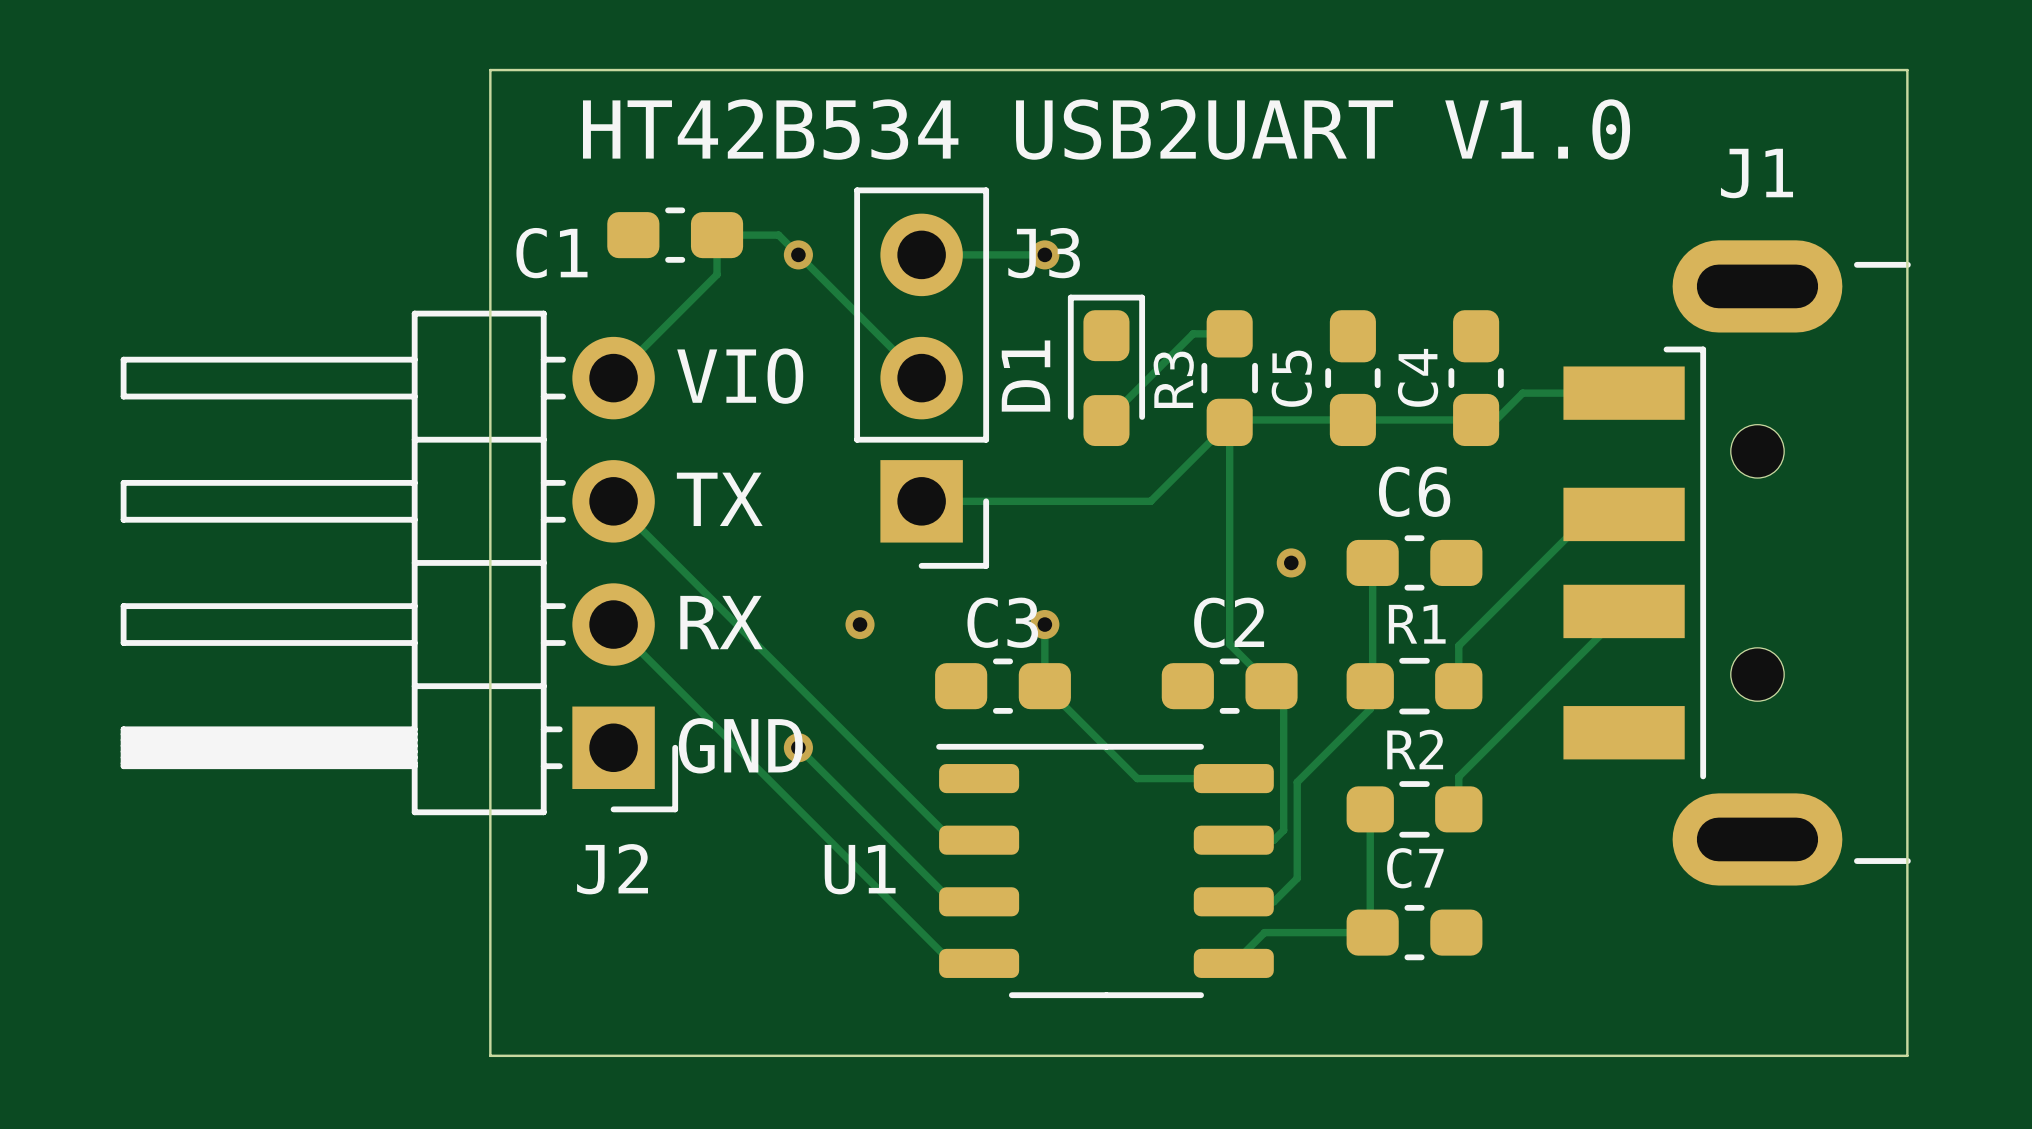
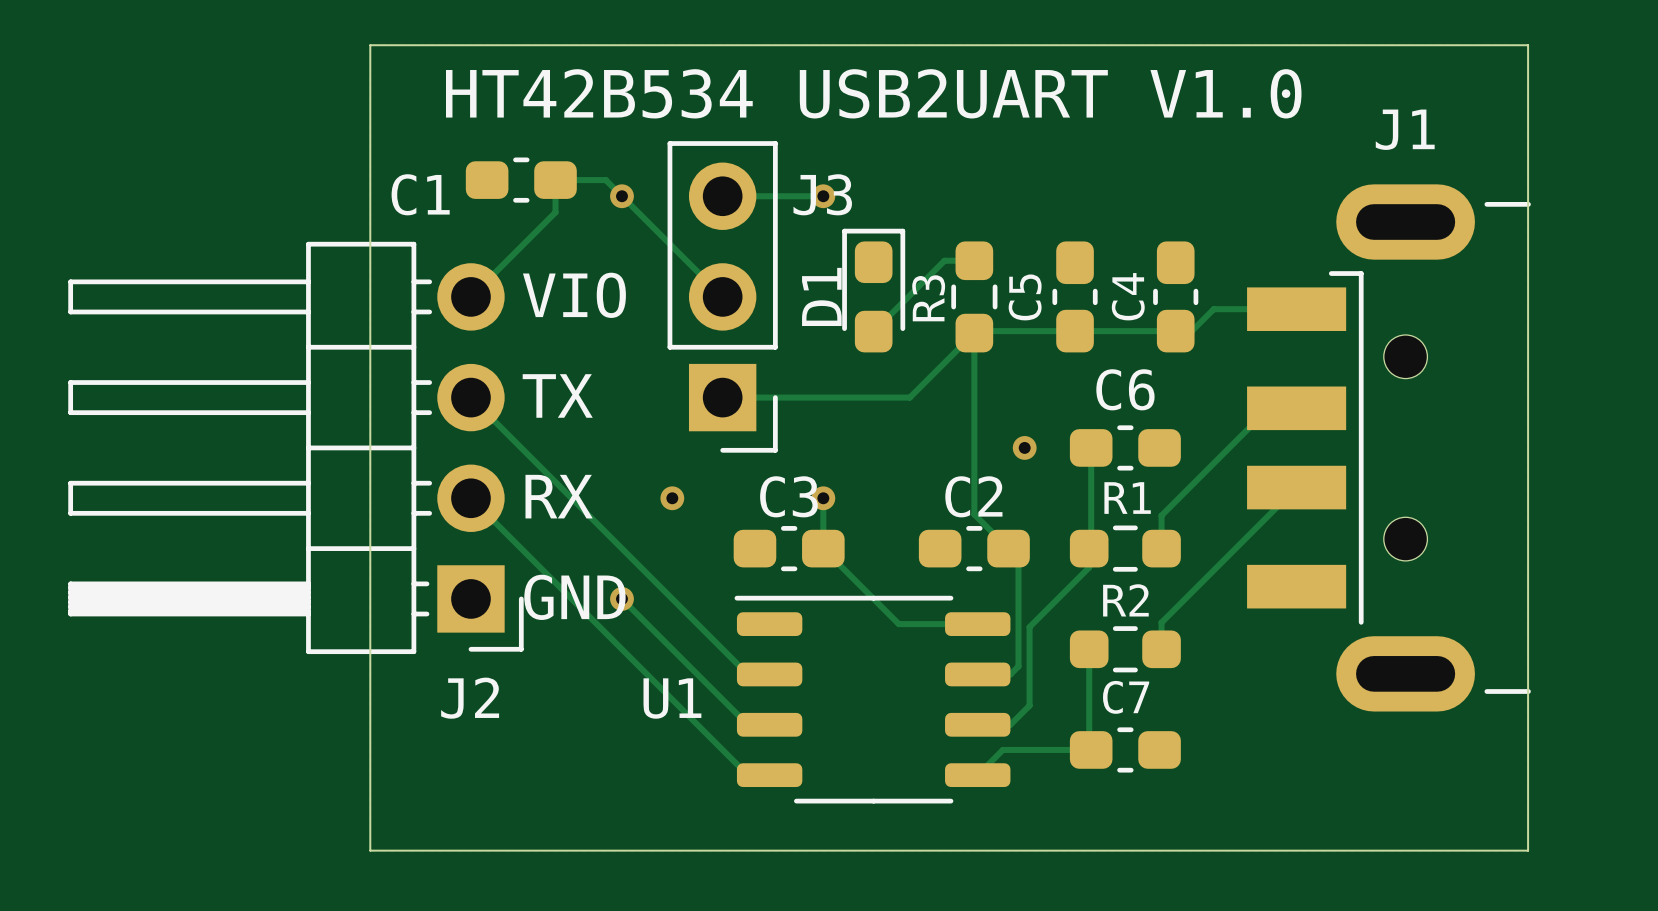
D1 name position: D1 (1026, 376) -> D1 (821, 296)

